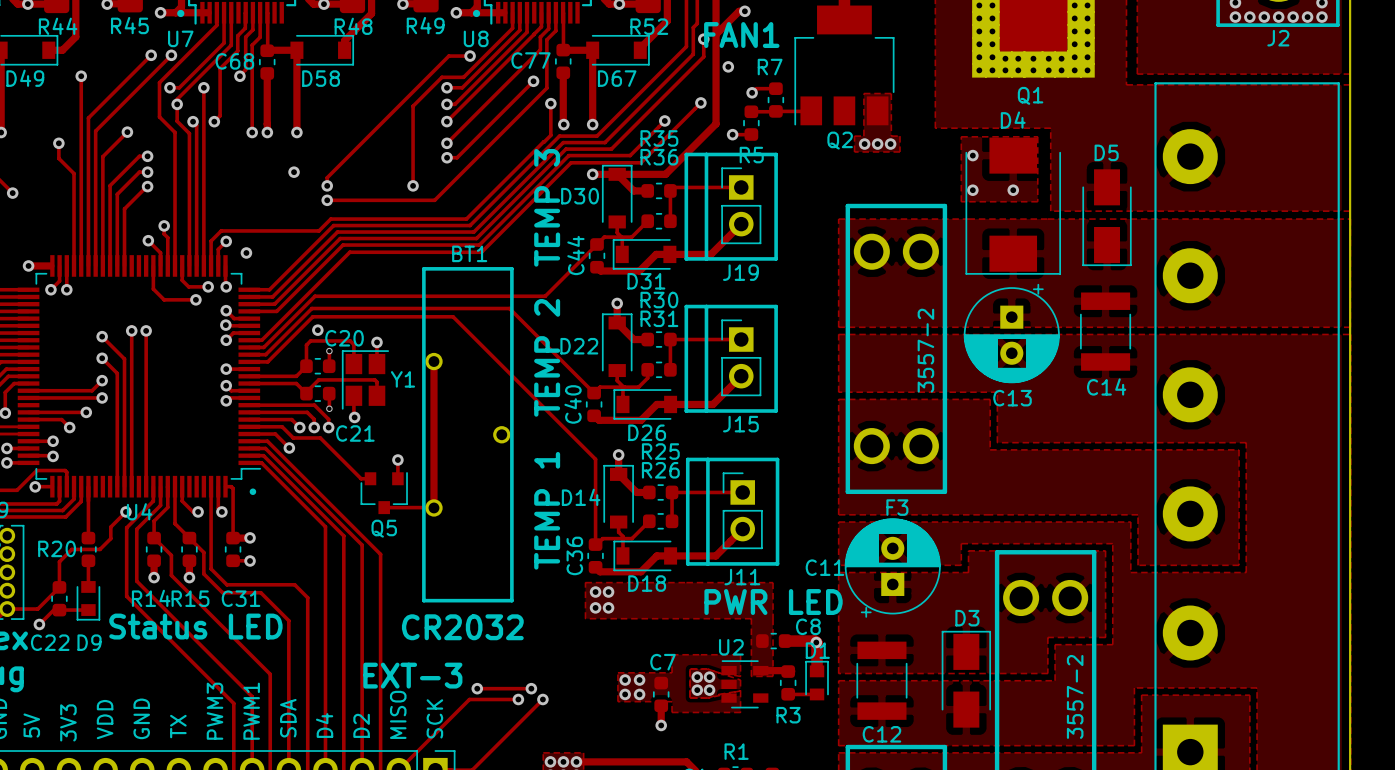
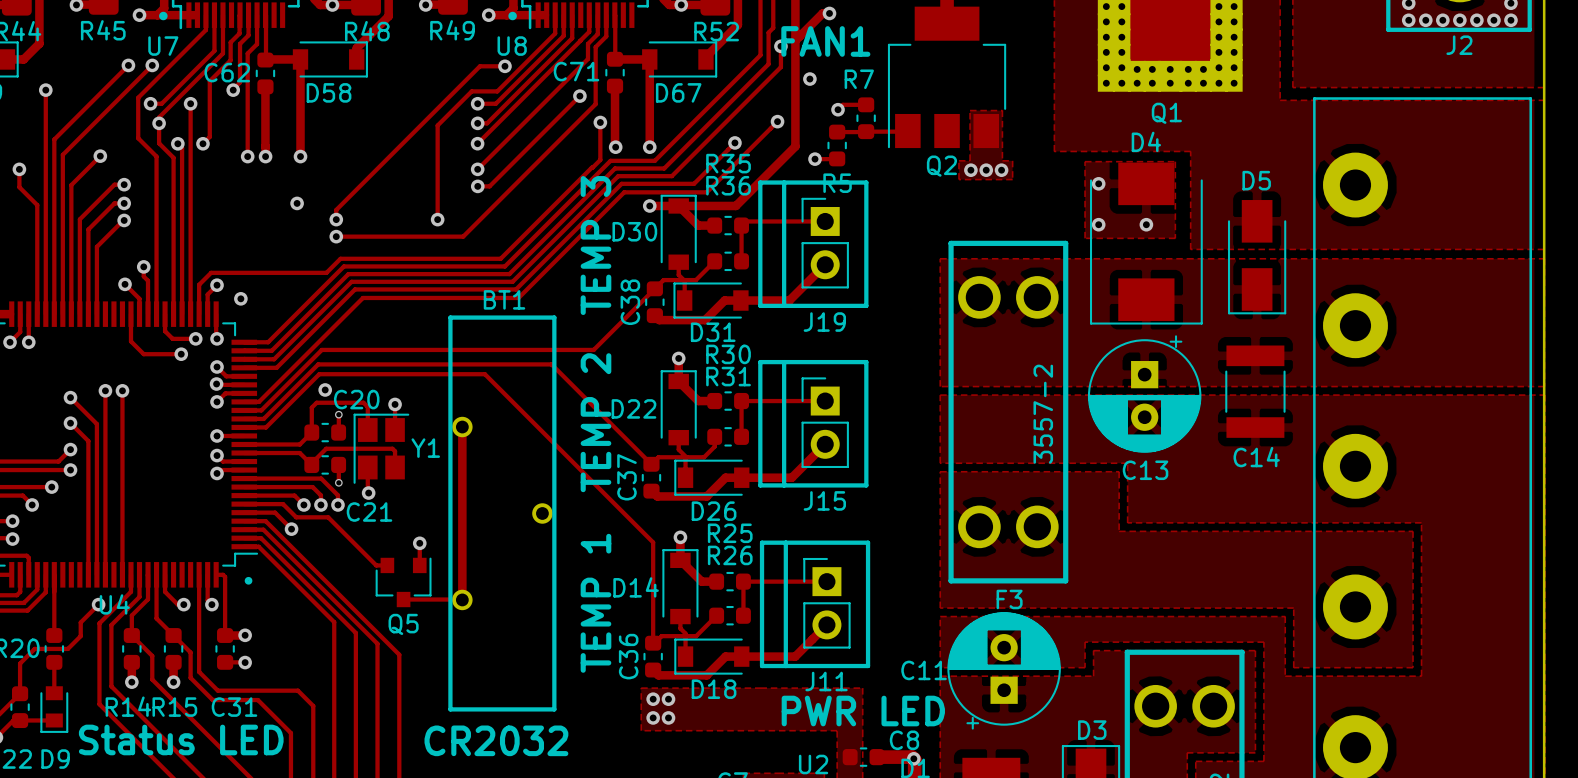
C77 name: C77 (530, 60) -> C71 (576, 71)
C68 name: C68 (234, 61) -> C62 (227, 72)
C44 name: C44 (575, 255) -> C38 (630, 302)
C40 name: C40 (573, 404) -> C37 (626, 477)

